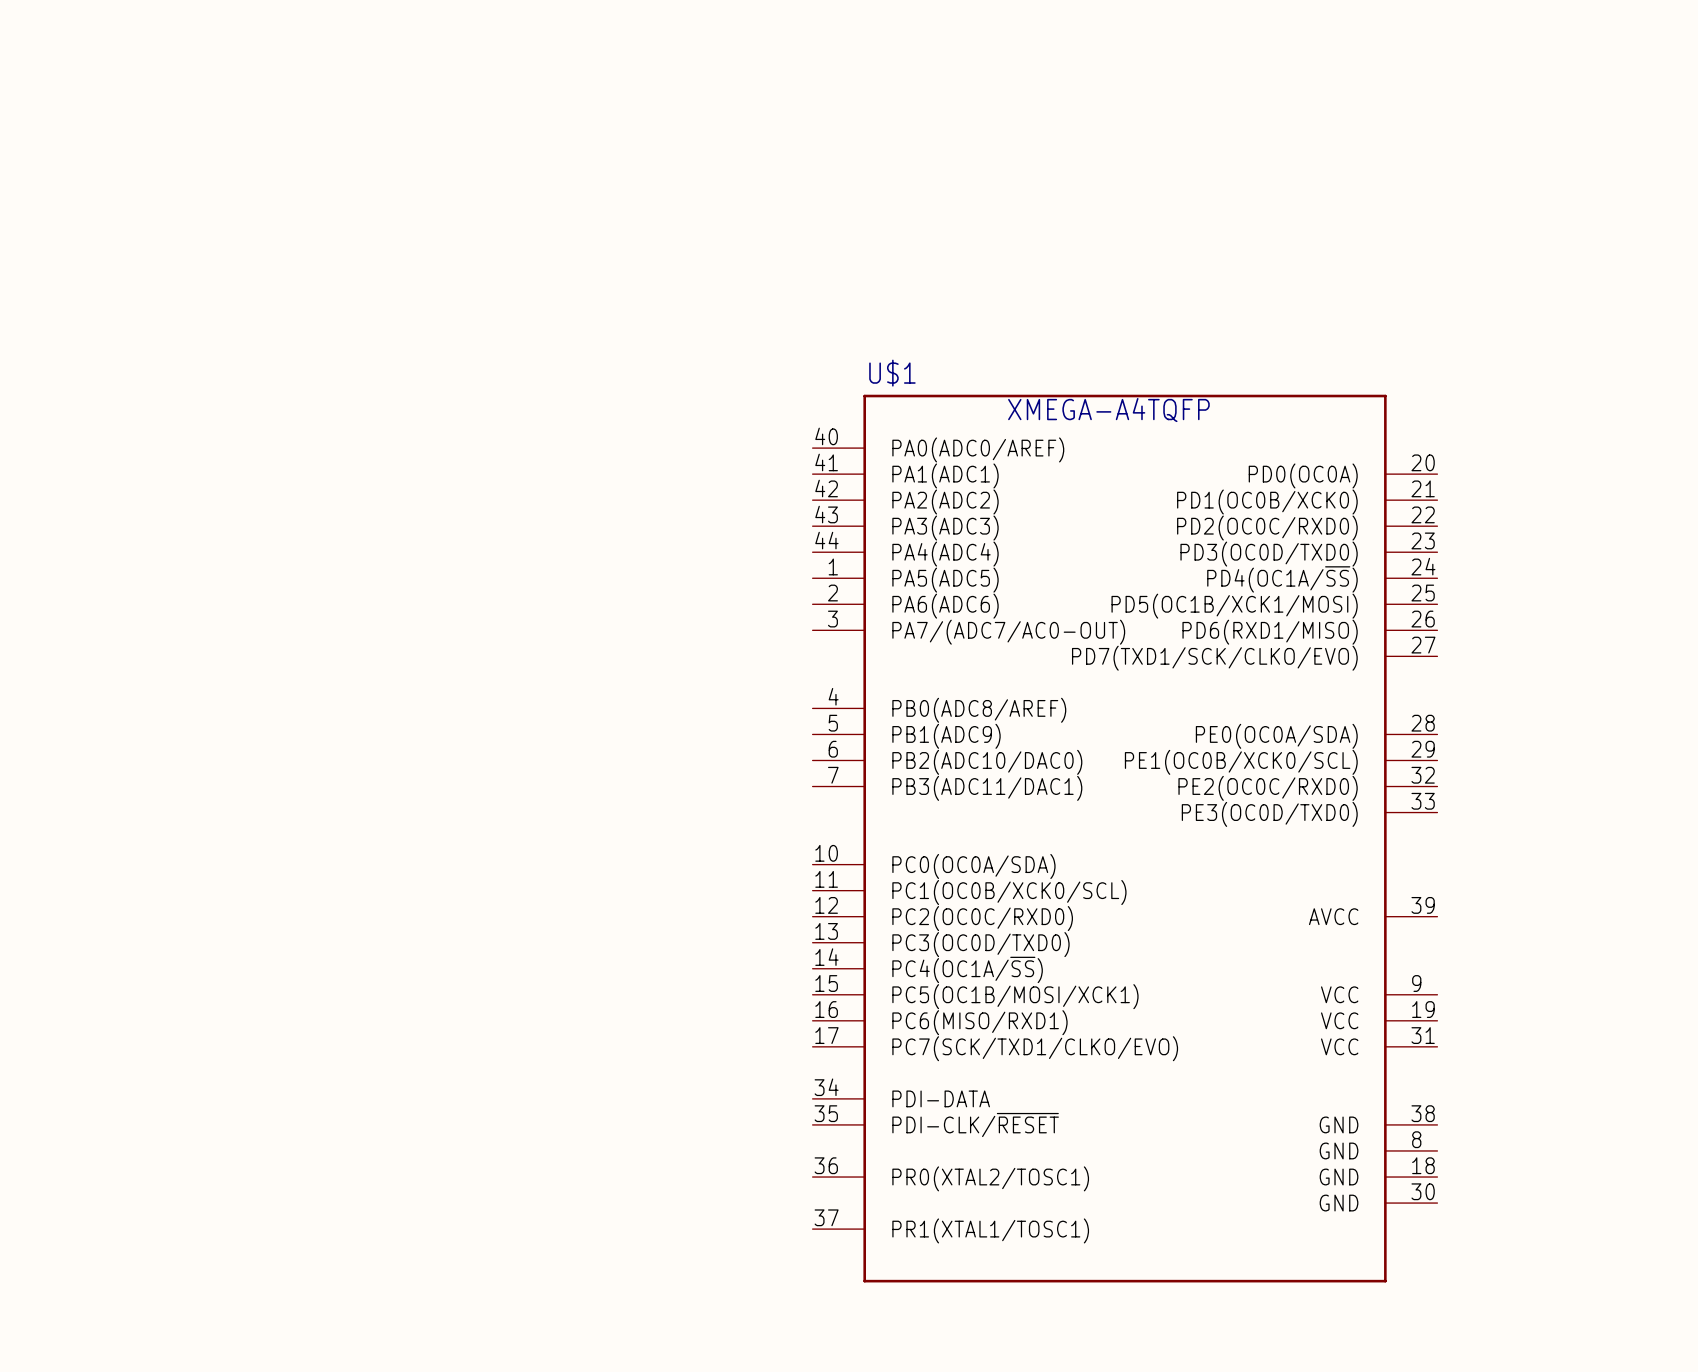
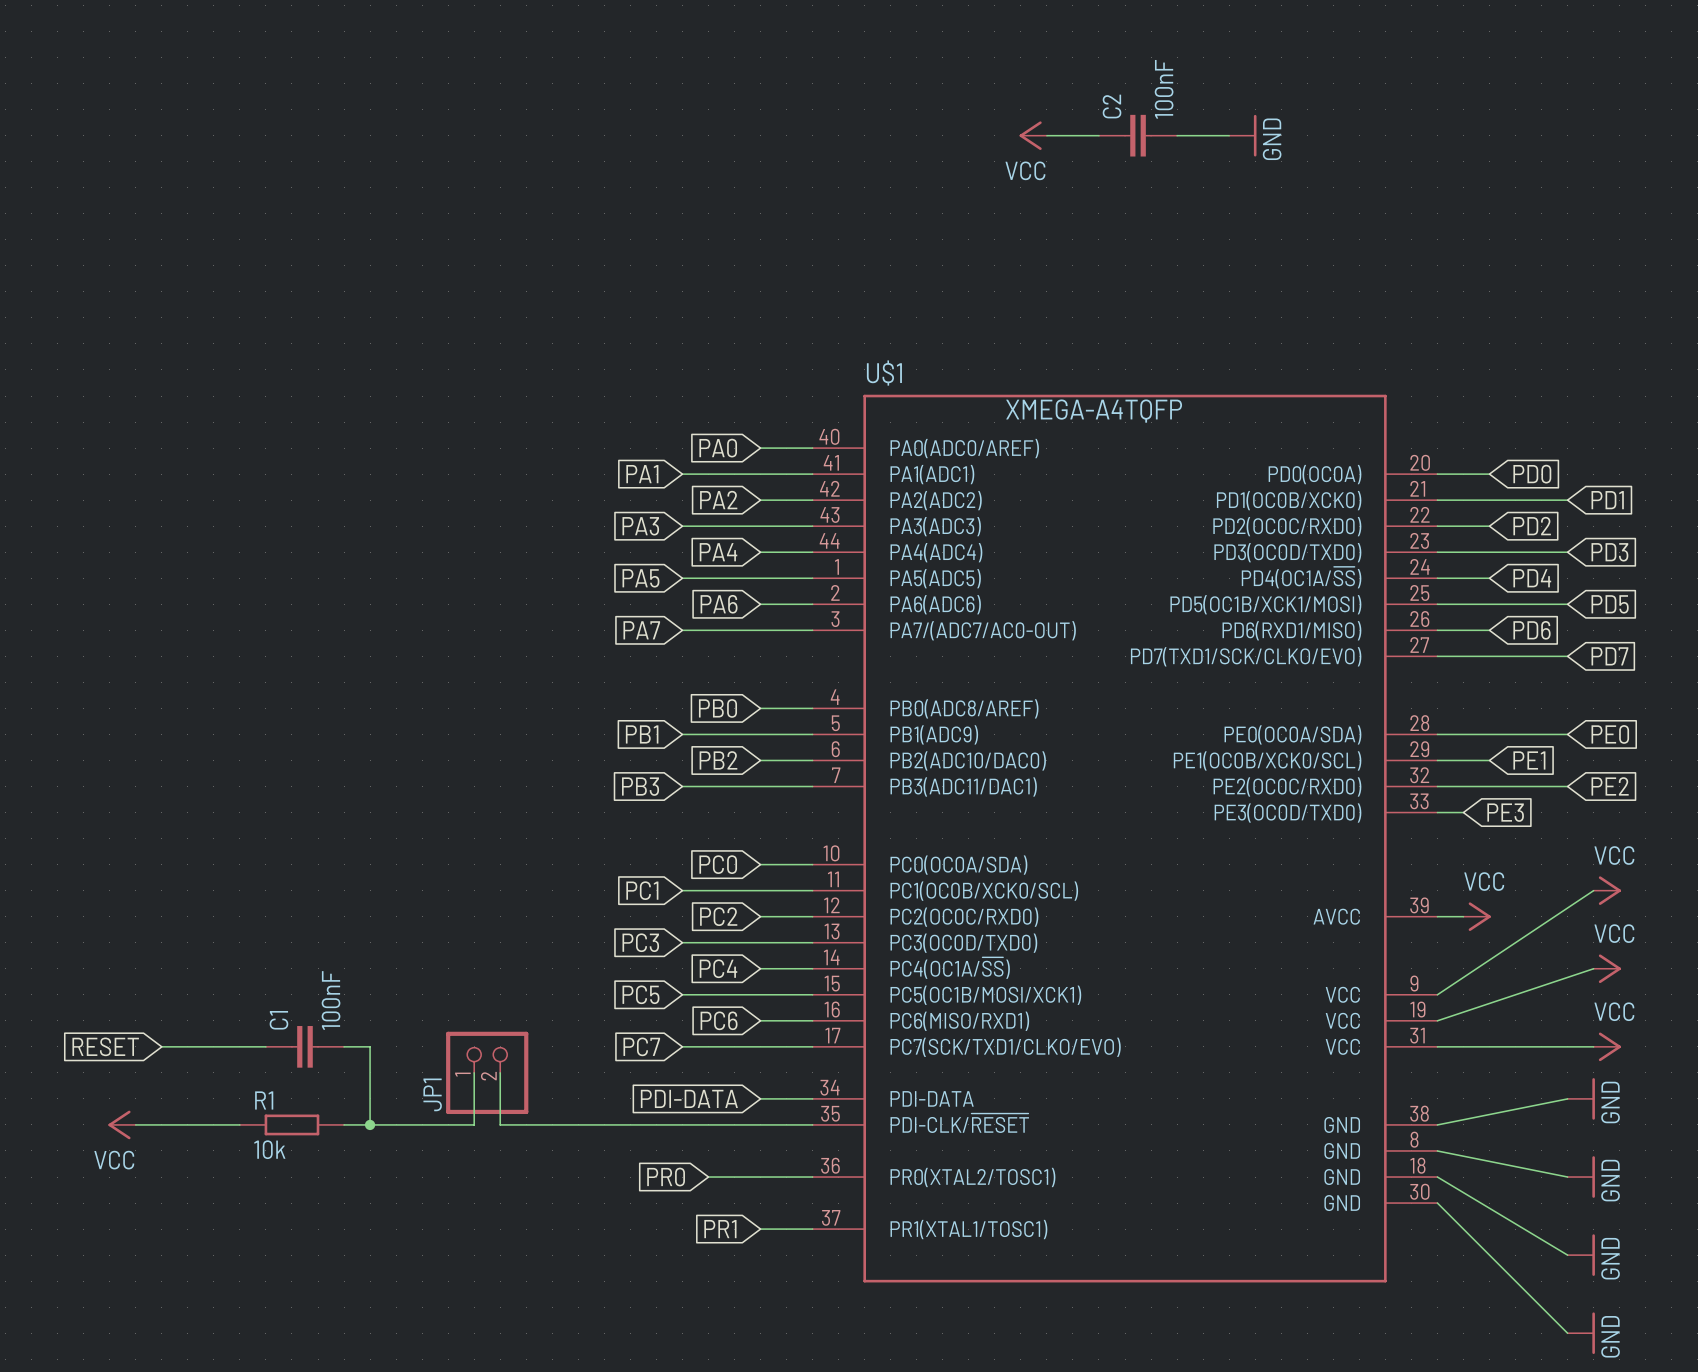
power symbol: none -> VCC (1033, 135)
wire: none -> (1046, 135) (1098, 135)
C2: none -> 100nF (1138, 135)
wire: none -> (1177, 135) (1229, 135)
power symbol: none -> GND (1242, 135)
global label: none -> PA0 (718, 448)
wire: none -> (760, 448) (812, 448)
global label: none -> PA1 (642, 474)
wire: none -> (682, 474) (812, 474)
wire: none -> (1437, 474) (1489, 474)
global label: none -> PD0 (1532, 474)
global label: none -> PA2 (718, 500)
wire: none -> (760, 500) (812, 500)
wire: none -> (1437, 500) (1567, 500)
global label: none -> PD1 (1607, 500)
global label: none -> PA3 (640, 526)
wire: none -> (682, 526) (812, 526)
wire: none -> (1437, 526) (1489, 526)
global label: none -> PD2 (1532, 526)
global label: none -> PA4 (718, 552)
wire: none -> (760, 552) (812, 552)
wire: none -> (1437, 552) (1567, 552)
global label: none -> PD3 (1609, 552)
global label: none -> PD4 (1532, 578)
global label: none -> PA5 (640, 578)
wire: none -> (682, 578) (812, 578)
wire: none -> (1437, 578) (1489, 578)
global label: none -> PA6 (719, 604)
wire: none -> (760, 604) (812, 604)
wire: none -> (1437, 604) (1567, 604)
global label: none -> PD5 (1610, 604)
global label: none -> PA7 (641, 630)
wire: none -> (682, 630) (812, 630)
wire: none -> (1437, 630) (1489, 630)
global label: none -> PD6 (1532, 630)
wire: none -> (1437, 656) (1567, 656)
global label: none -> PD7 (1609, 656)
global label: none -> PB0 (717, 708)
wire: none -> (760, 708) (812, 708)
global label: none -> PB1 (642, 734)
wire: none -> (682, 734) (812, 734)
wire: none -> (1437, 734) (1567, 734)
global label: none -> PE0 (1610, 734)
global label: none -> PB2 (718, 760)
wire: none -> (760, 760) (812, 760)
wire: none -> (1437, 760) (1489, 760)
global label: none -> PE1 (1529, 760)
global label: none -> PB3 (640, 786)
wire: none -> (682, 786) (812, 786)
wire: none -> (1437, 786) (1567, 786)
global label: none -> PE2 (1610, 786)
wire: none -> (1437, 812) (1463, 812)
global label: none -> PE3 (1505, 812)
global label: none -> PC0 (718, 864)
wire: none -> (760, 864) (812, 864)
global label: none -> PC1 (642, 890)
wire: none -> (682, 890) (812, 890)
wire: none -> (1593, 890) (1437, 994)
power symbol: none -> VCC (1607, 890)
global label: none -> PC2 (718, 916)
wire: none -> (760, 916) (812, 916)
wire: none -> (1437, 916) (1463, 916)
power symbol: none -> VCC (1477, 916)
global label: none -> PC3 (640, 942)
wire: none -> (682, 942) (812, 942)
global label: none -> PC4 (718, 968)
wire: none -> (760, 968) (812, 968)
wire: none -> (1593, 968) (1437, 1020)
power symbol: none -> VCC (1607, 968)
global label: none -> PC5 (640, 994)
wire: none -> (682, 994) (812, 994)
global label: none -> PC6 (719, 1020)
wire: none -> (760, 1020) (812, 1020)
global label: none -> RESET (105, 1046)
wire: none -> (161, 1046) (265, 1046)
C1: none -> 100nF (304, 1046)
wire: none -> (344, 1046) (370, 1046) (370, 1124)
global label: none -> PC7 (641, 1046)
wire: none -> (682, 1046) (812, 1046)
wire: none -> (1437, 1046) (1593, 1046)
power symbol: none -> VCC (1607, 1046)
wire: none -> (474, 1072) (474, 1124) (344, 1124)
JP1: none -> (487, 1072)
wire: none -> (500, 1072) (500, 1124) (812, 1124)
global label: none -> PDI-DATA (689, 1098)
wire: none -> (760, 1098) (812, 1098)
wire: none -> (1567, 1098) (1437, 1124)
power symbol: none -> GND (1581, 1098)
power symbol: none -> VCC (122, 1124)
wire: none -> (135, 1124) (239, 1124)
R1: none -> 10k (291, 1124)
junction: none -> (370, 1124)
wire: none -> (1437, 1150) (1567, 1177)
global label: none -> PR0 (666, 1177)
wire: none -> (708, 1177) (812, 1177)
wire: none -> (1437, 1177) (1567, 1255)
power symbol: none -> GND (1581, 1177)
wire: none -> (1437, 1203) (1567, 1333)
global label: none -> PR1 (720, 1229)
wire: none -> (760, 1229) (812, 1229)
power symbol: none -> GND (1581, 1255)
power symbol: none -> GND (1581, 1333)

